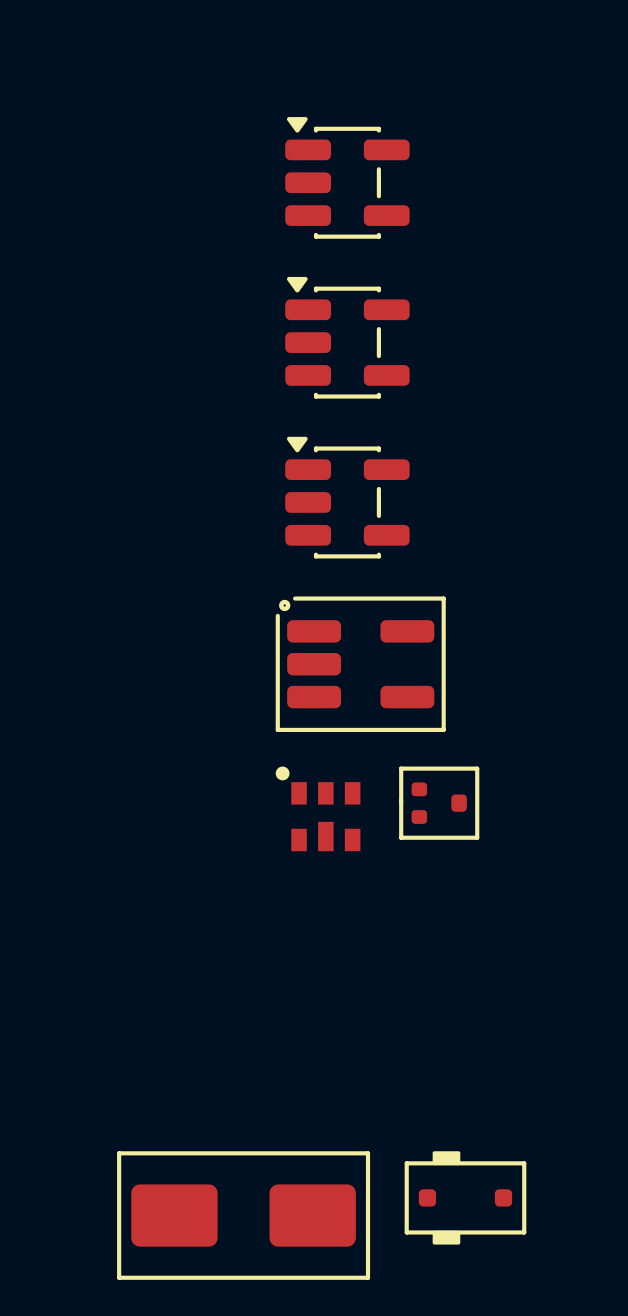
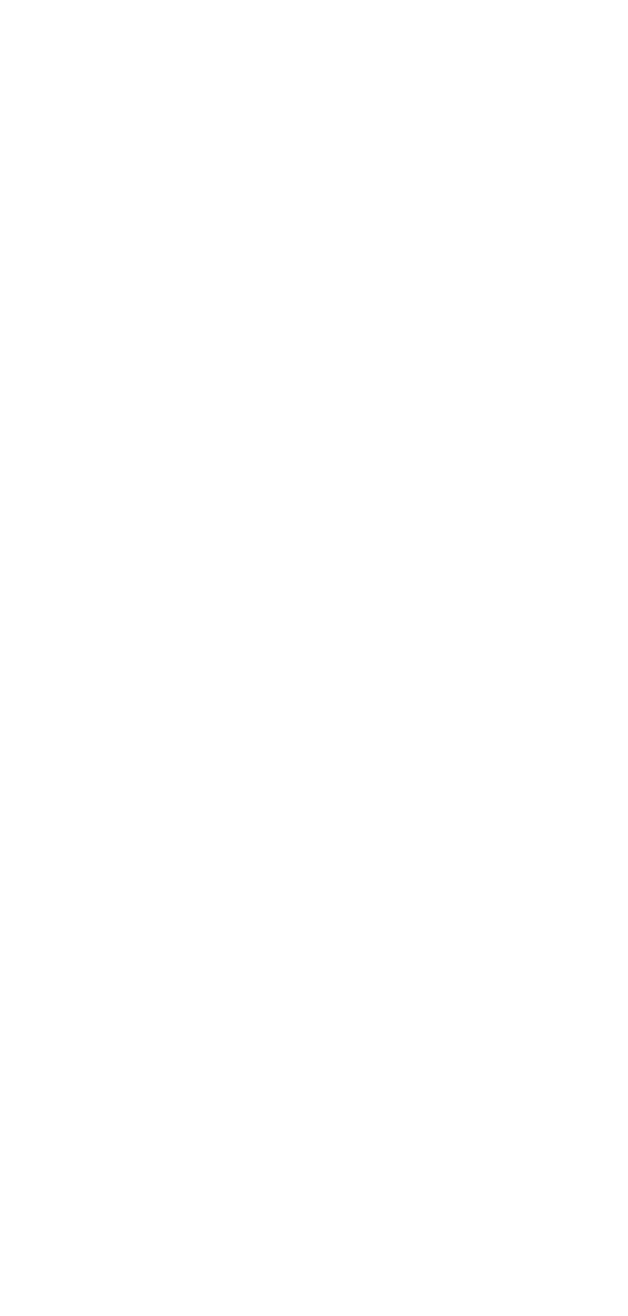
part: (347, 177) -> none
part: (347, 337) -> none
part: (347, 497) -> none
part: (360, 664) -> none
part: (439, 803) -> none
part: (318, 808) -> none
part: (465, 1197) -> none
part: (243, 1215) -> none

